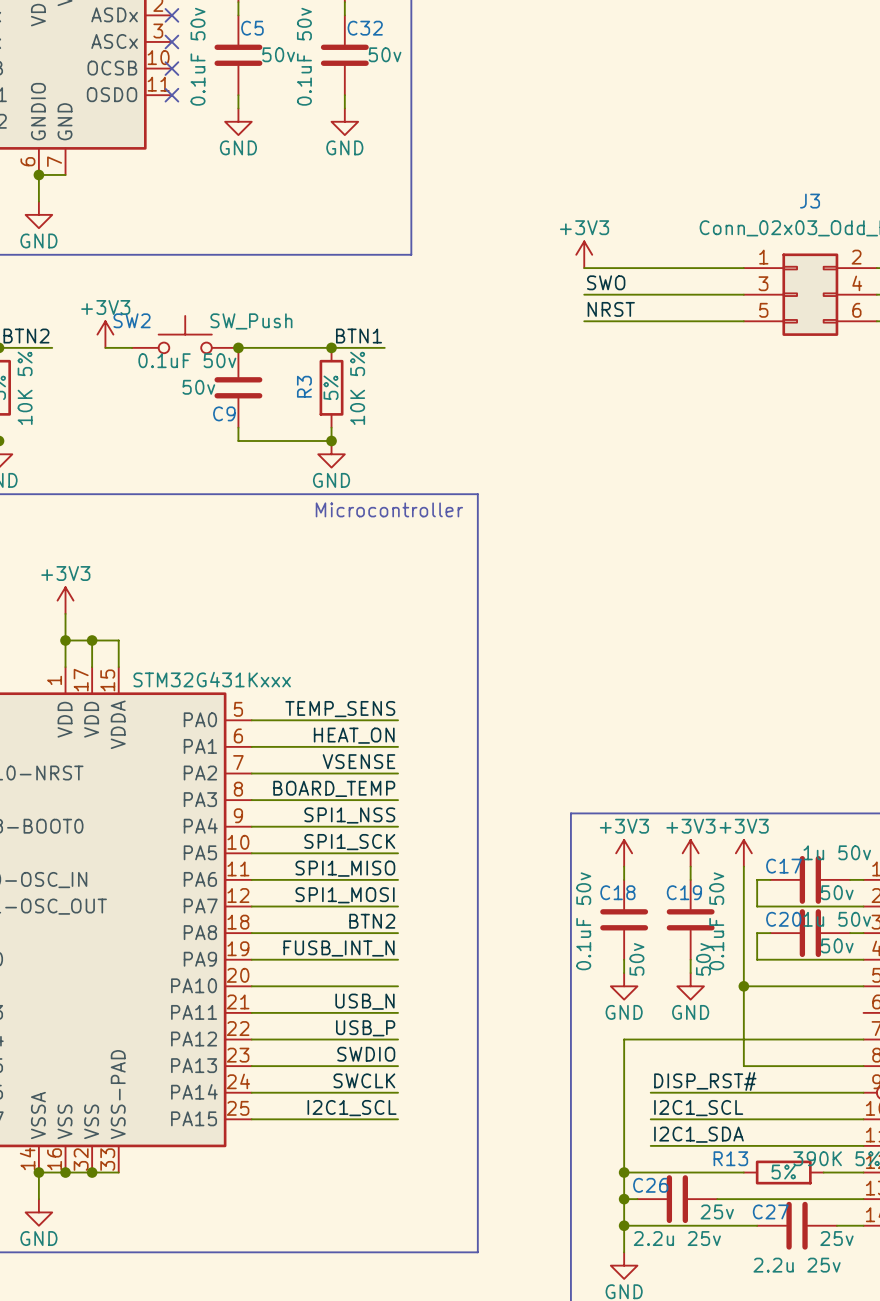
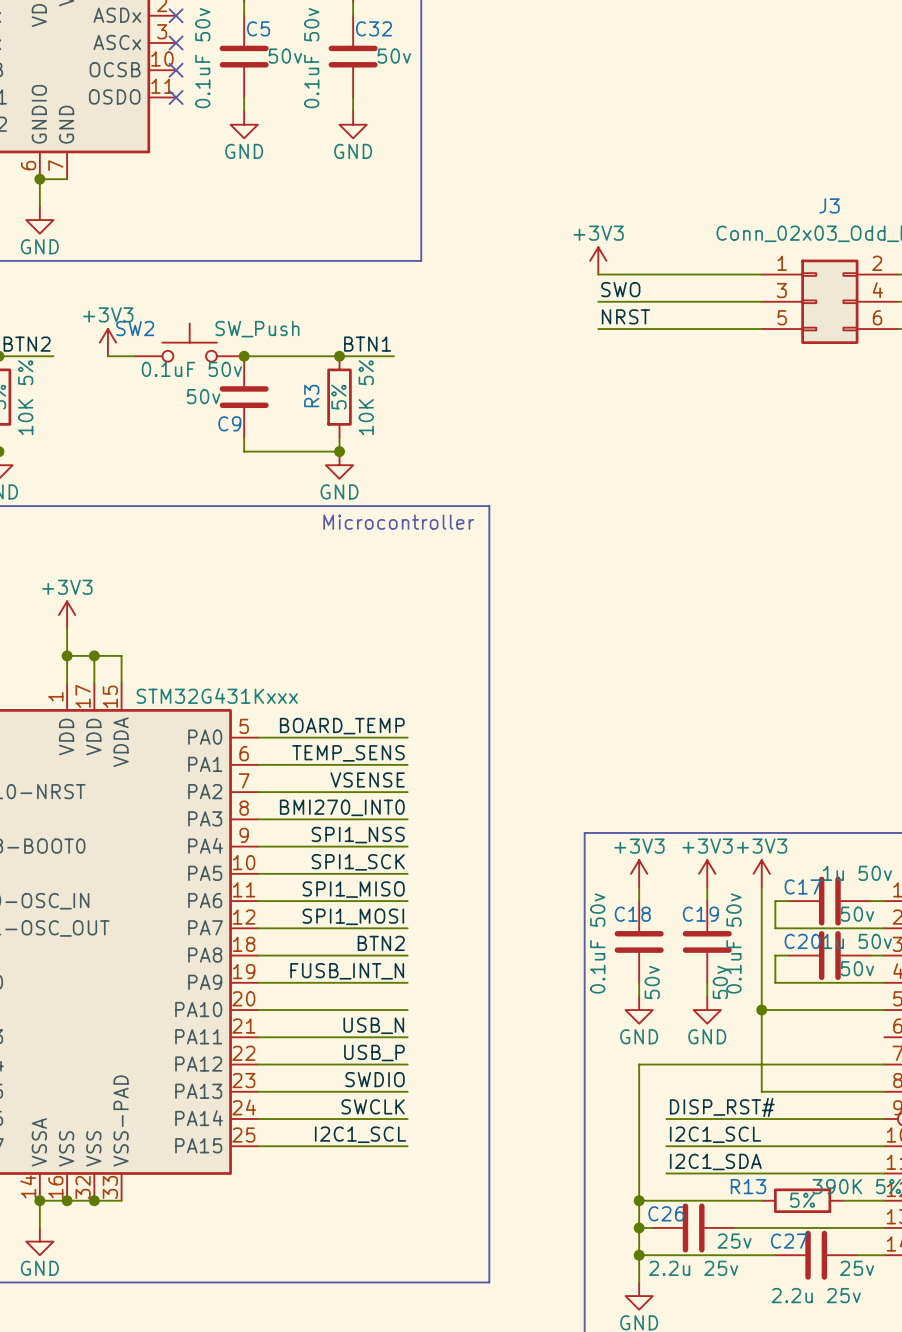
label: TEMP_SENS (340, 709) -> BOARD_TEMP (342, 726)
label: HEAT_ON (354, 735) -> TEMP_SENS (348, 753)
label: BOARD_TEMP (334, 788) -> BMI270_INT0 (342, 807)

